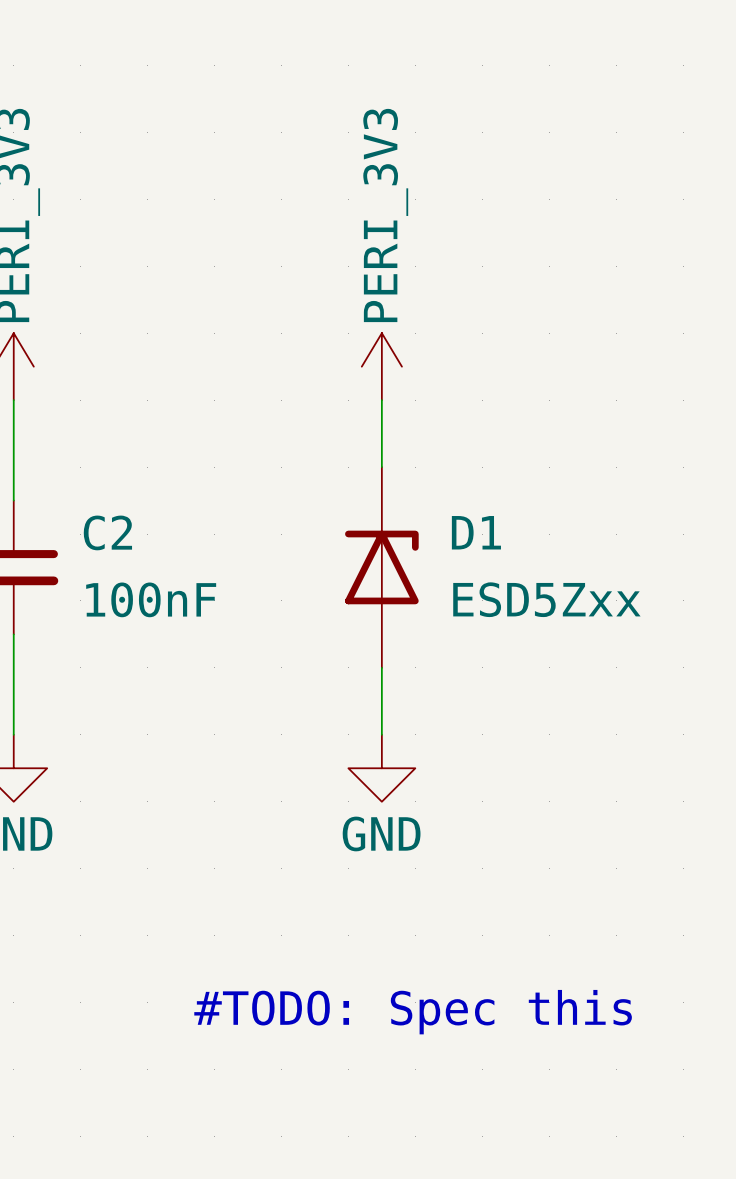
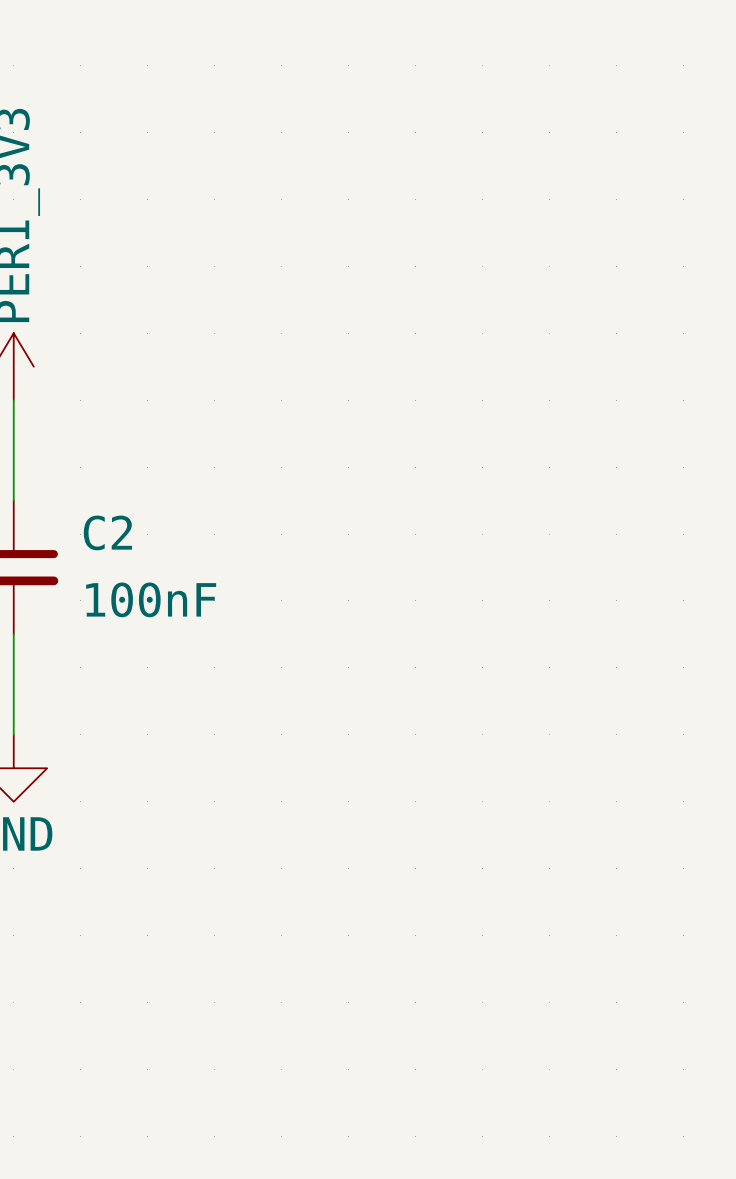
power symbol: PERI_3V3 (381, 366) -> none
wire: (381, 400) (381, 467) -> none
D1: ESD5Zxx (381, 567) -> none
wire: (381, 667) (381, 734) -> none
power symbol: GND (381, 768) -> none
text: #TODO: Spec this (413, 1012) -> none

